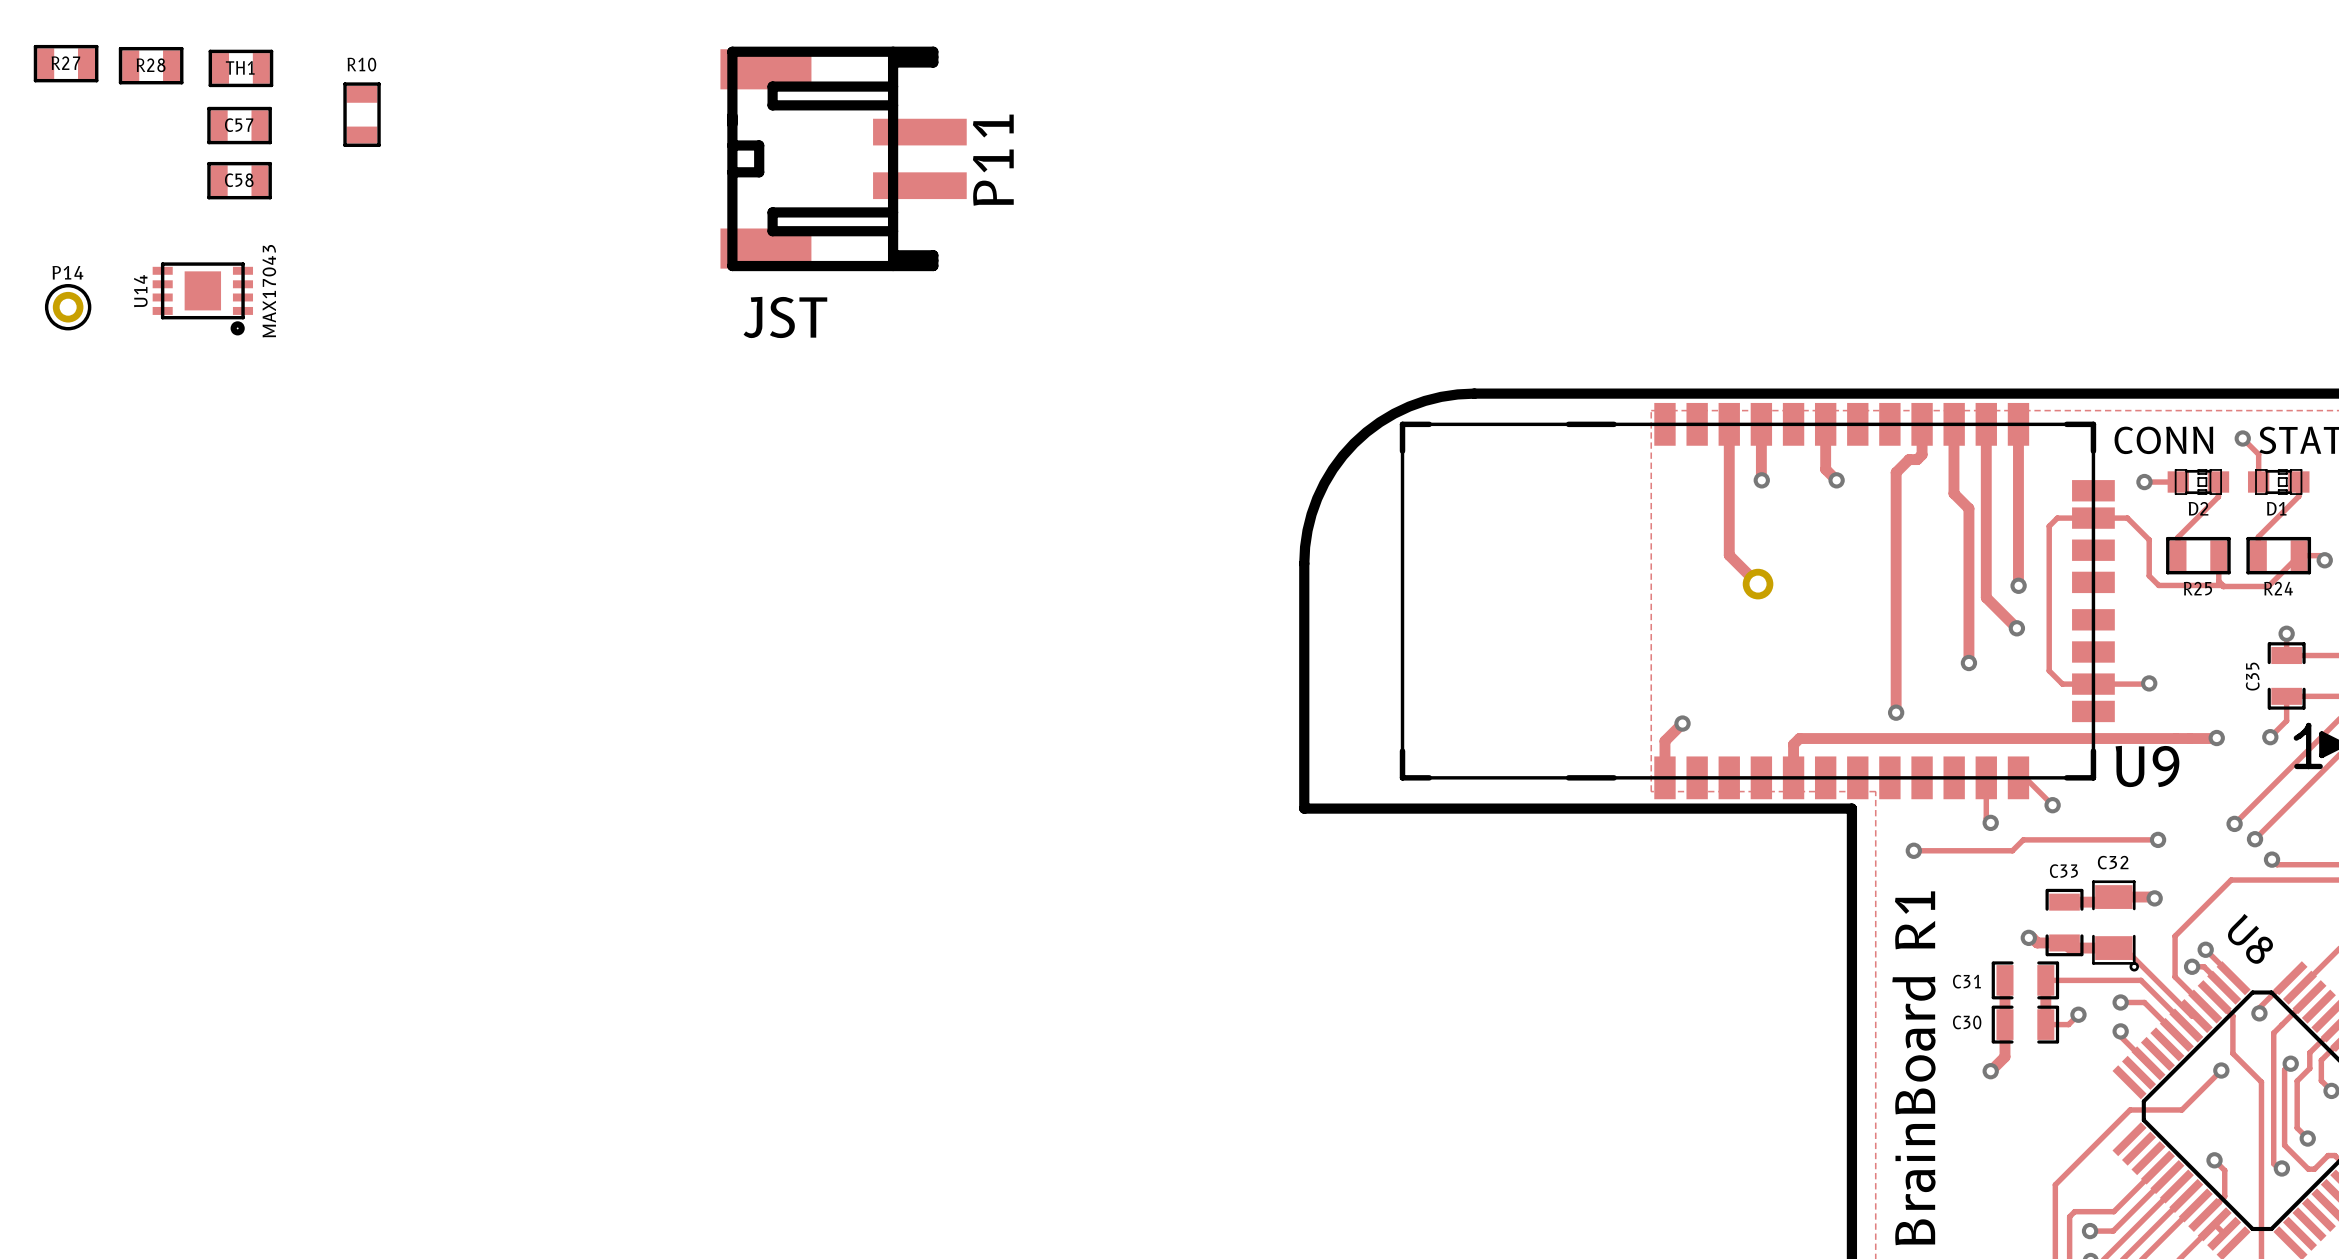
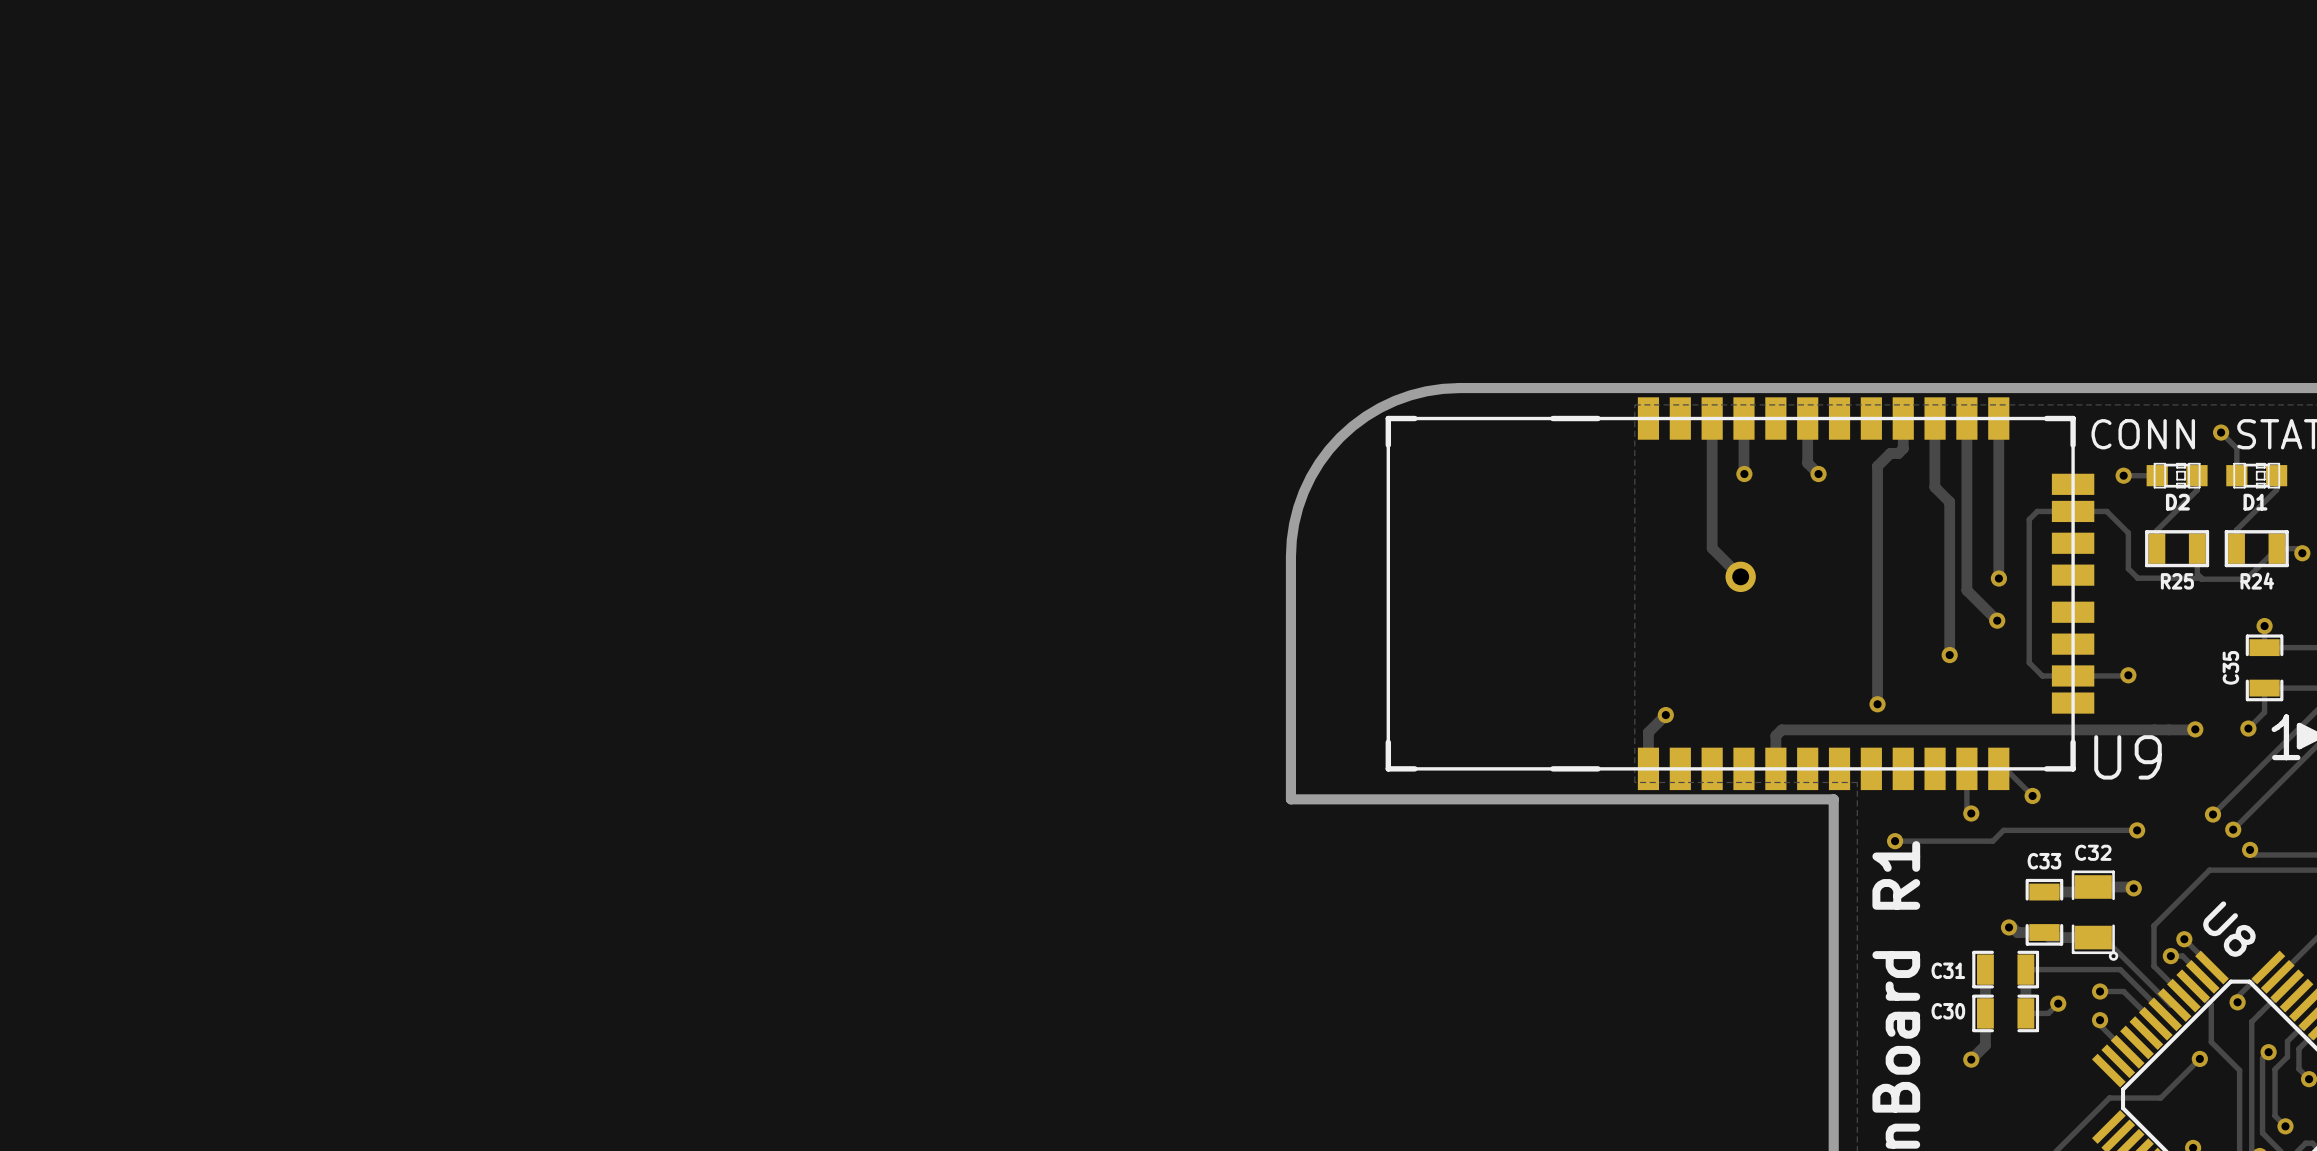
R27: (66, 63) -> none
R28: (151, 65) -> none
TH1: (240, 68) -> none
R10: (362, 114) -> none
C57: (239, 125) -> none
P11: JST (843, 158) -> none
C58: (239, 180) -> none
U14: MAX17043 (202, 298) -> none
P14: (68, 307) -> none

